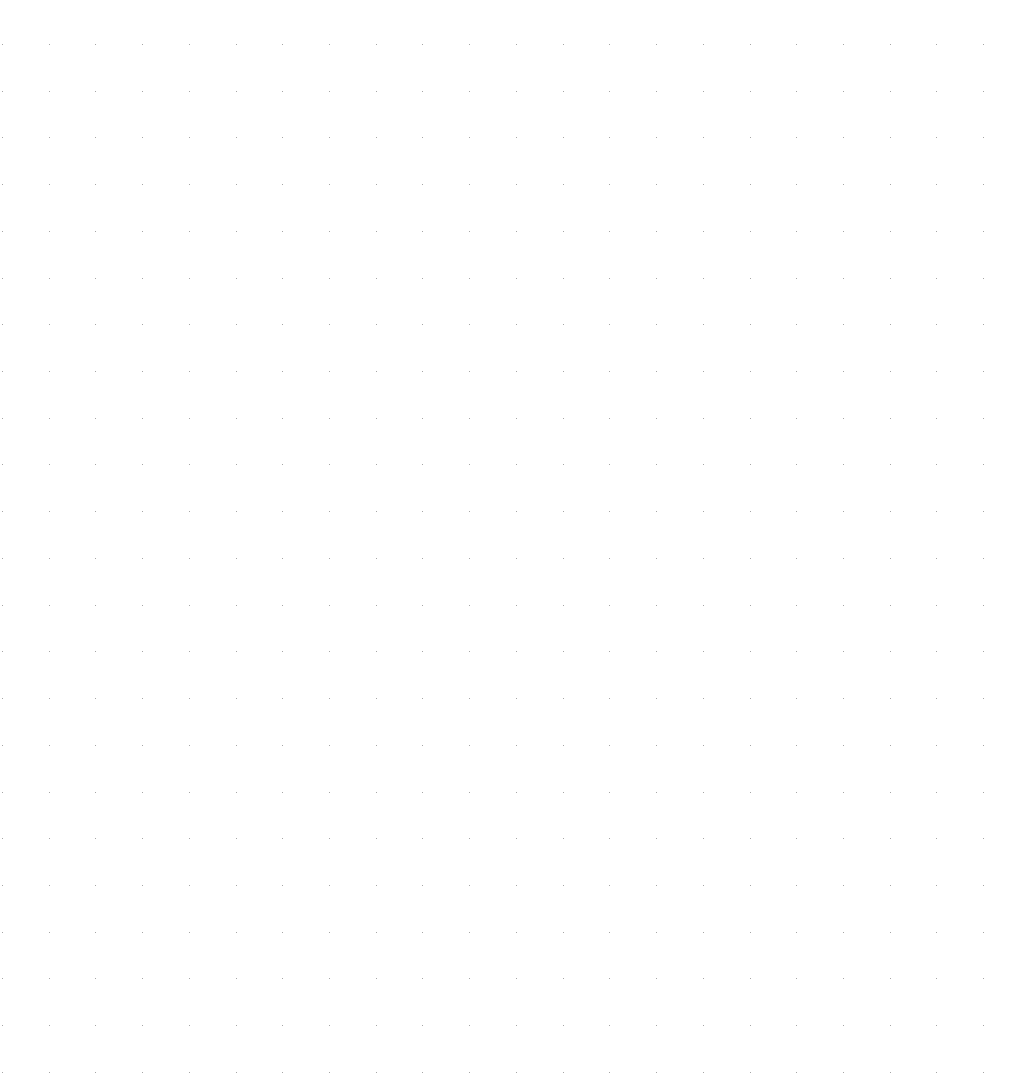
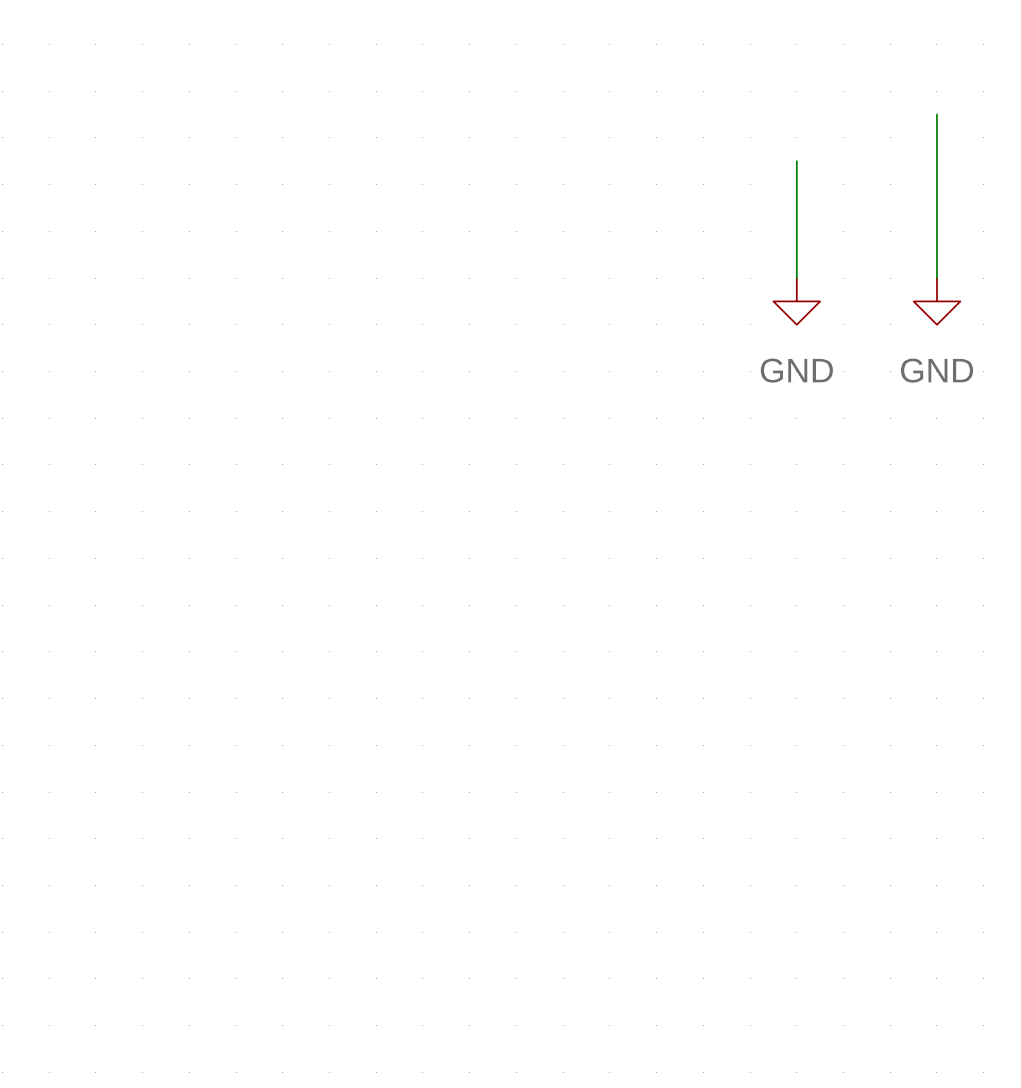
wire: none -> (936, 114) (936, 278)
wire: none -> (796, 161) (796, 278)
power symbol: none -> GND (796, 301)
power symbol: none -> GND (936, 301)

